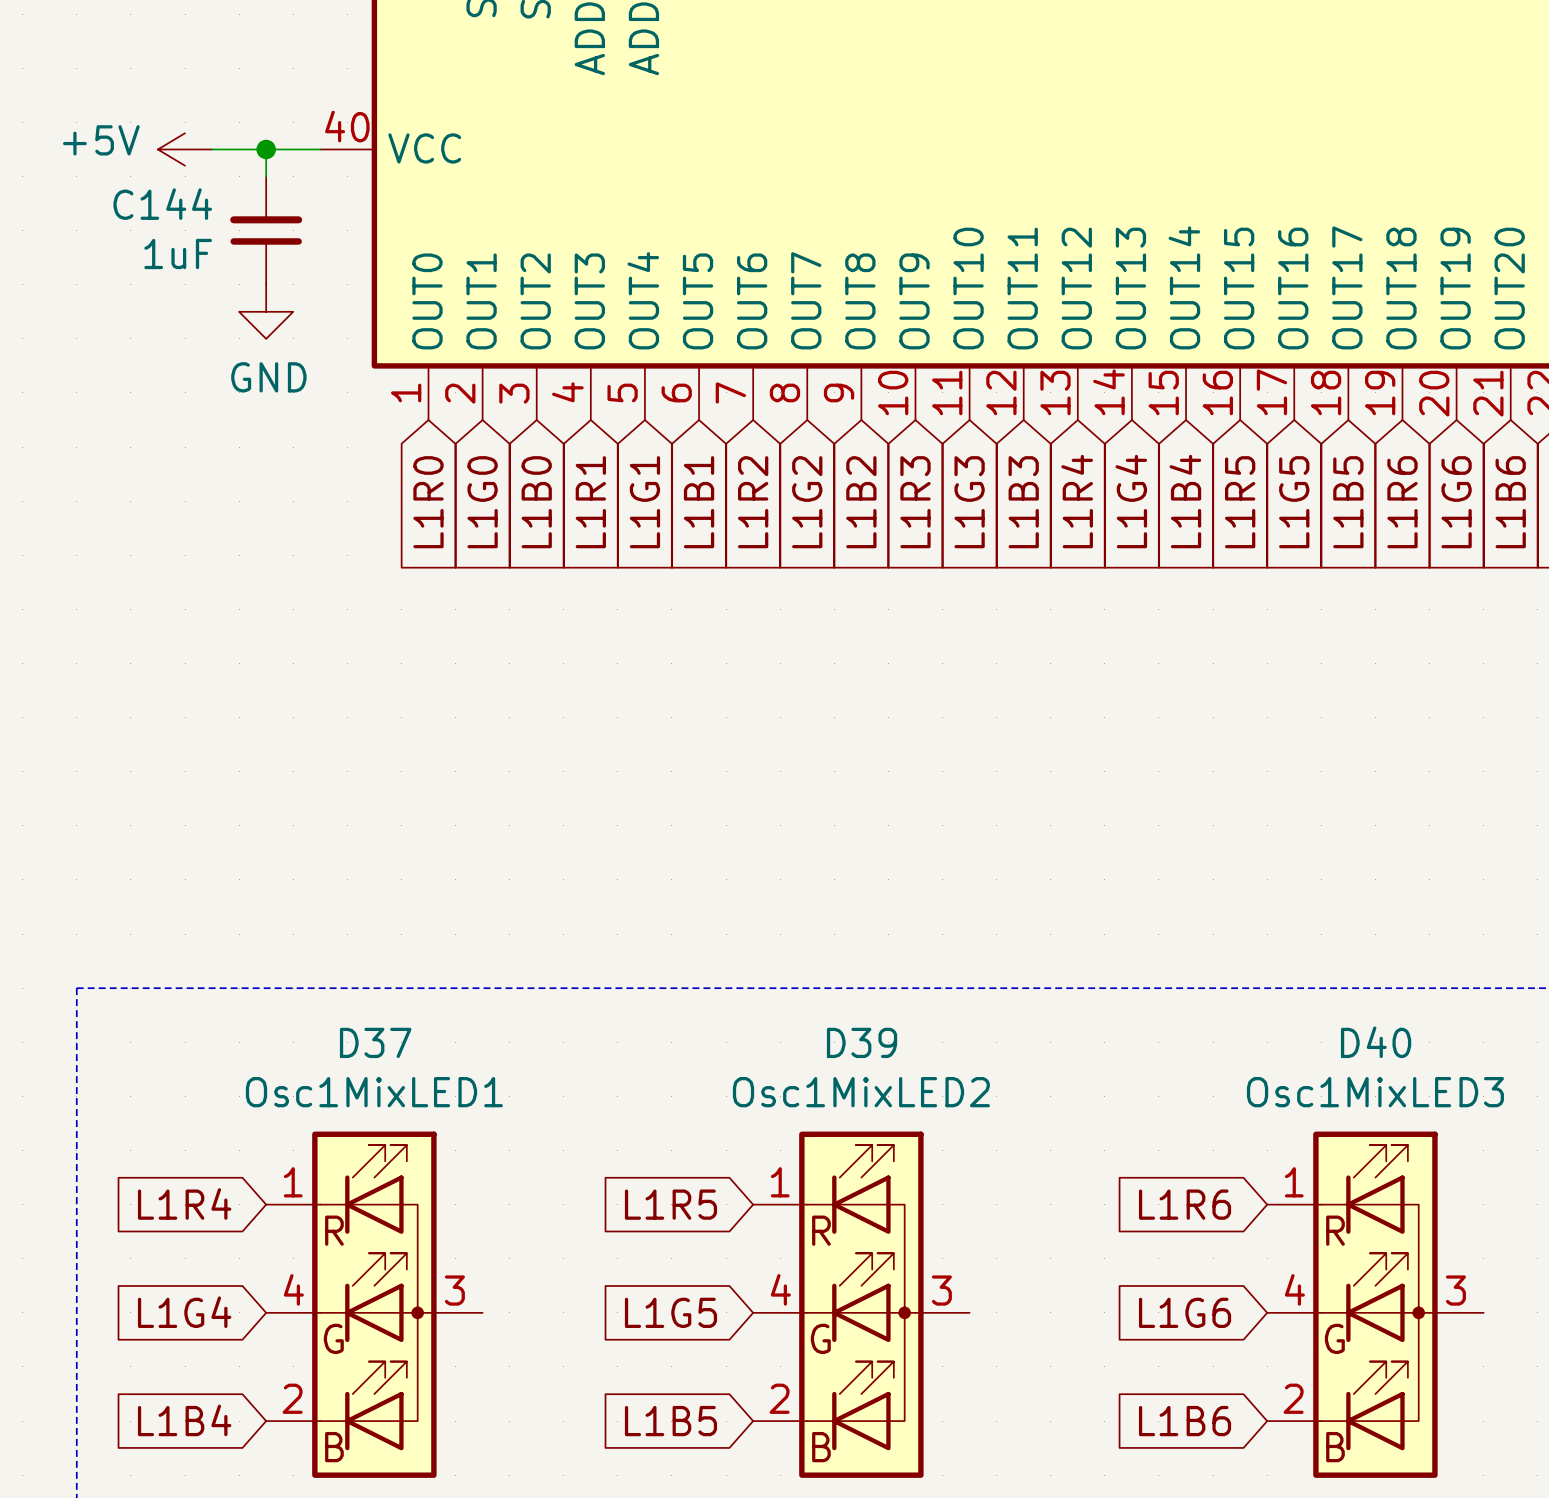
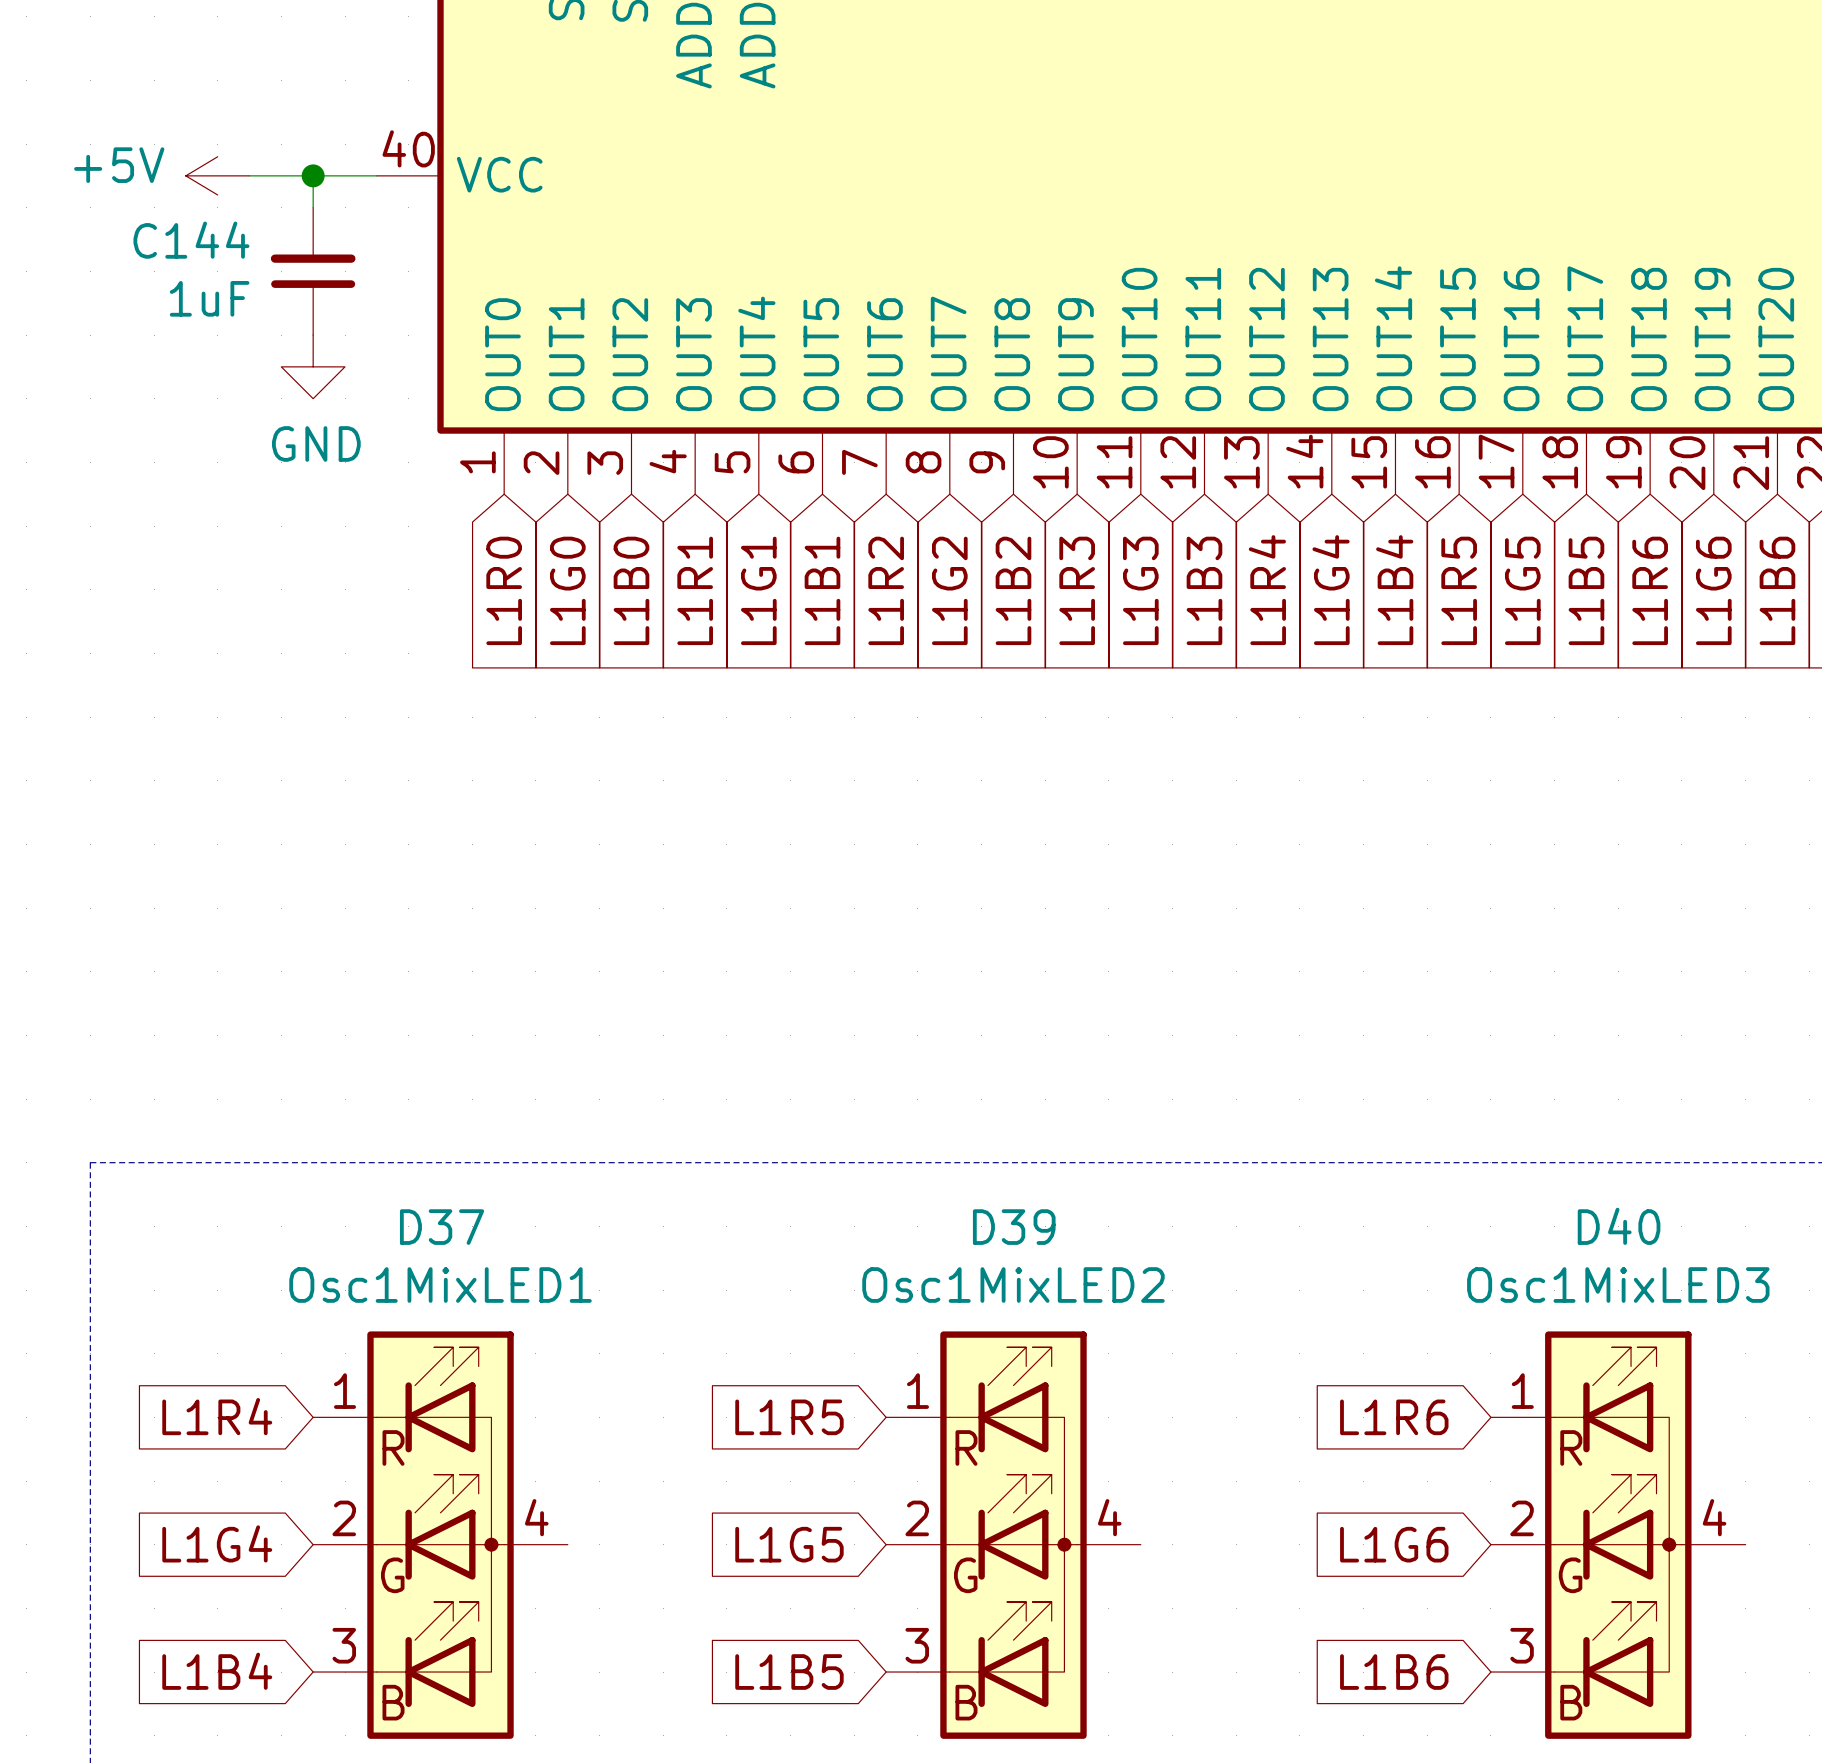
D37 symbol: [266, 1131, 483, 1478] -> [313, 1331, 568, 1739]
D39 symbol: [753, 1131, 970, 1478] -> [886, 1331, 1141, 1739]
D40 symbol: [1267, 1131, 1484, 1478] -> [1490, 1331, 1746, 1739]

